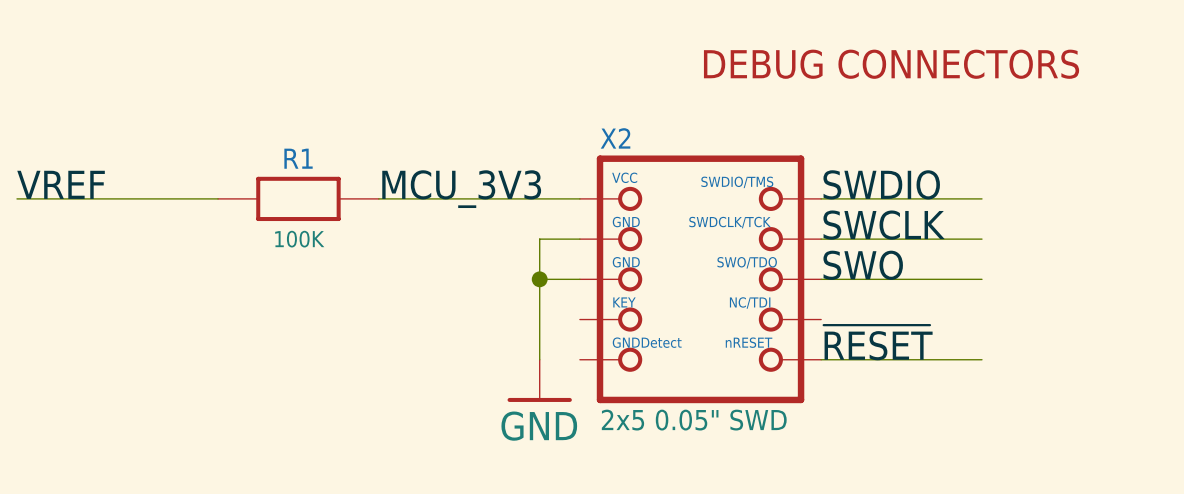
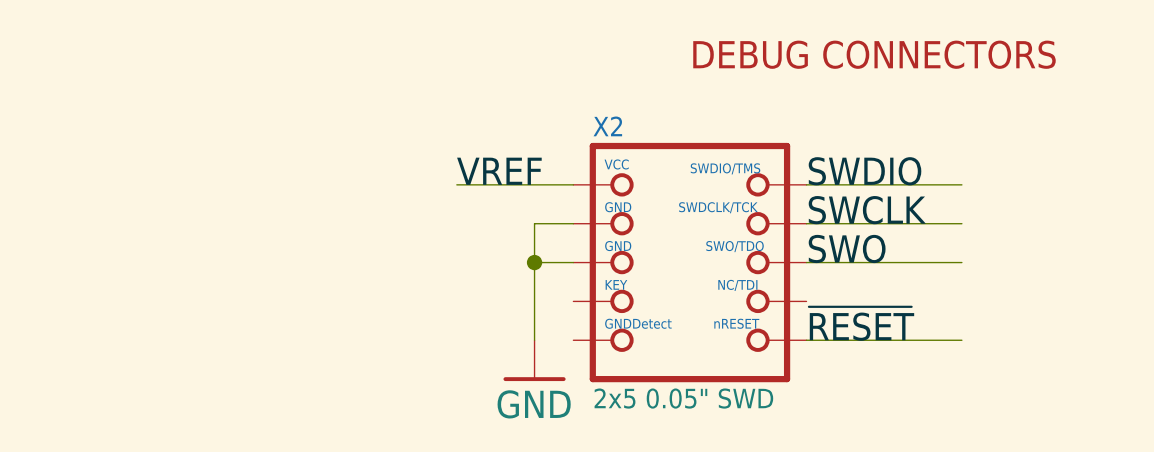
label: VREF (61, 184) -> none
label: none -> VREF (499, 171)
label: MCU_3V3 (461, 189) -> none
wire: (16, 198) (218, 198) -> none
R1: 100K (298, 198) -> none
wire: (378, 198) (459, 198) -> none

